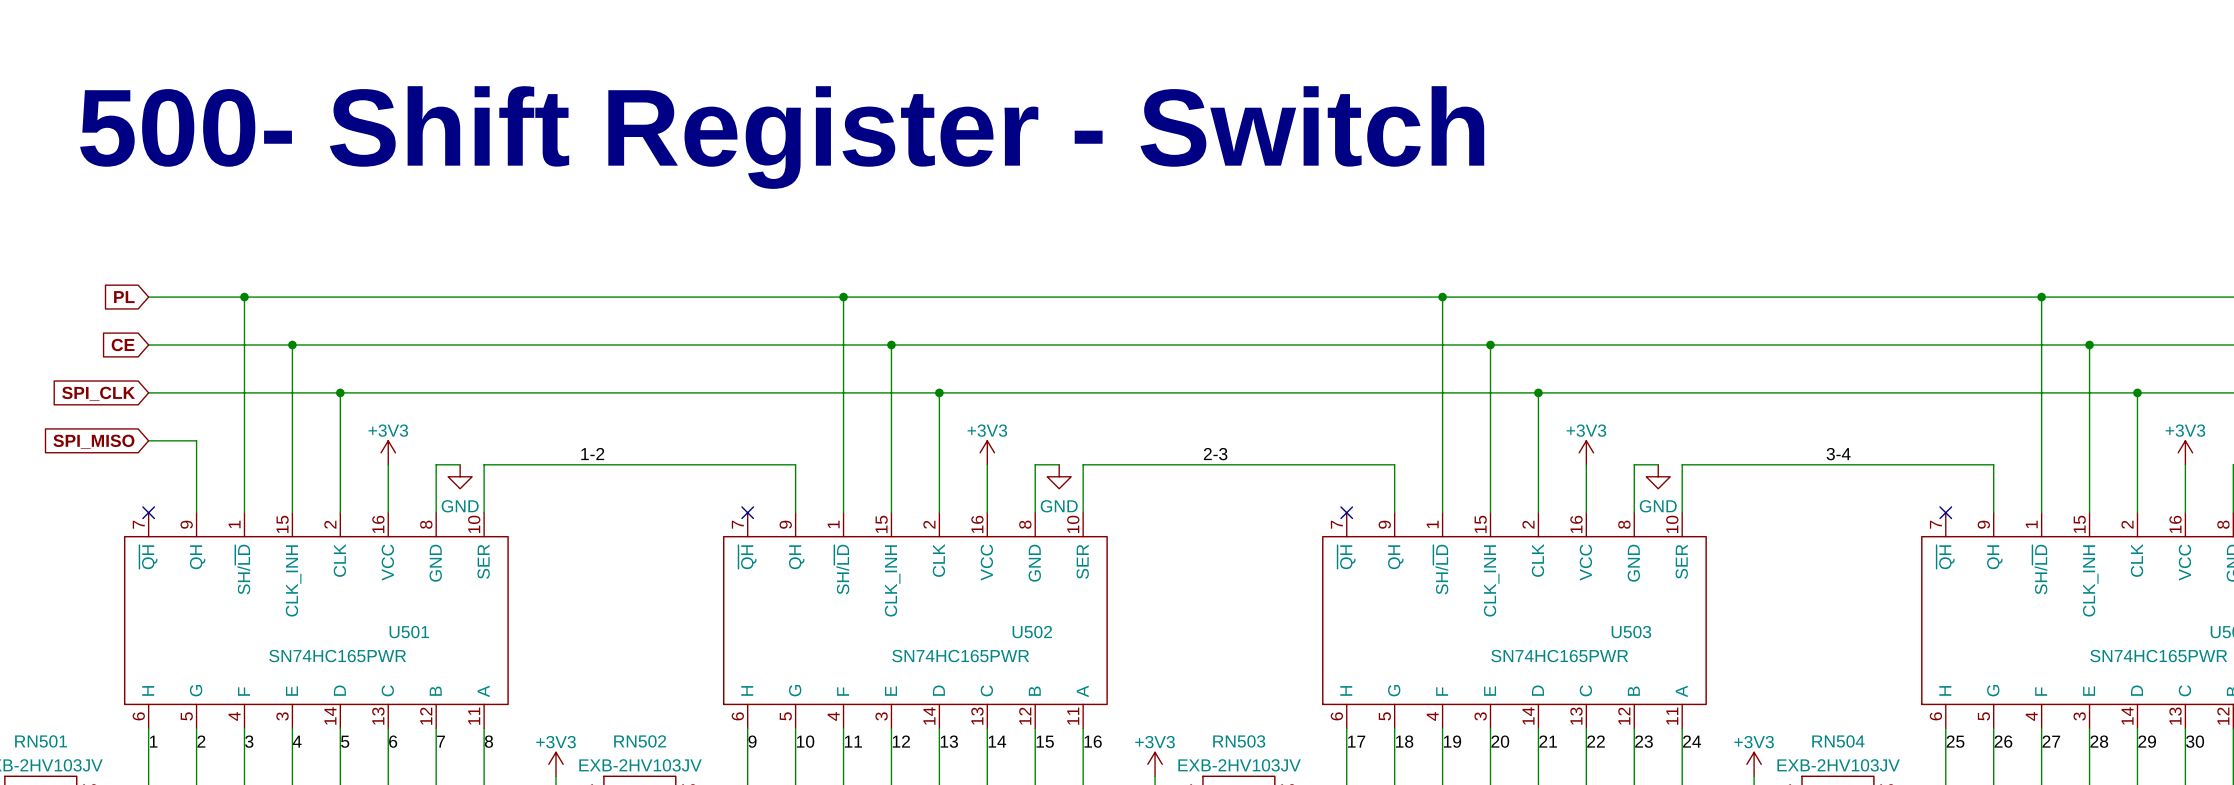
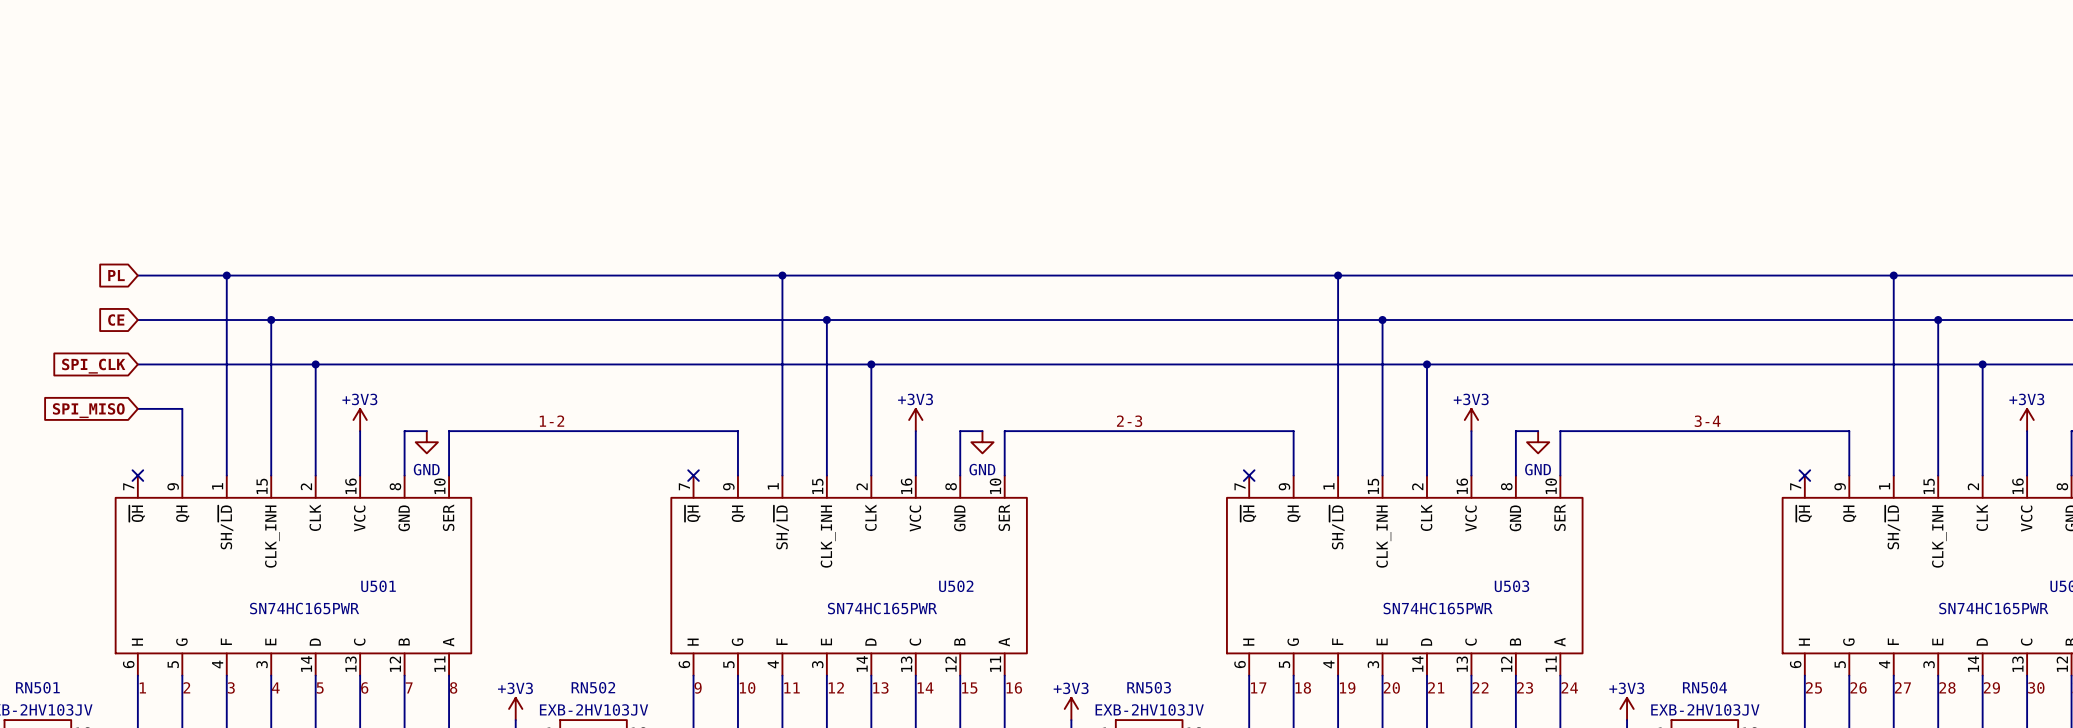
text: 500- Shift Register - Switch (782, 137) -> none

